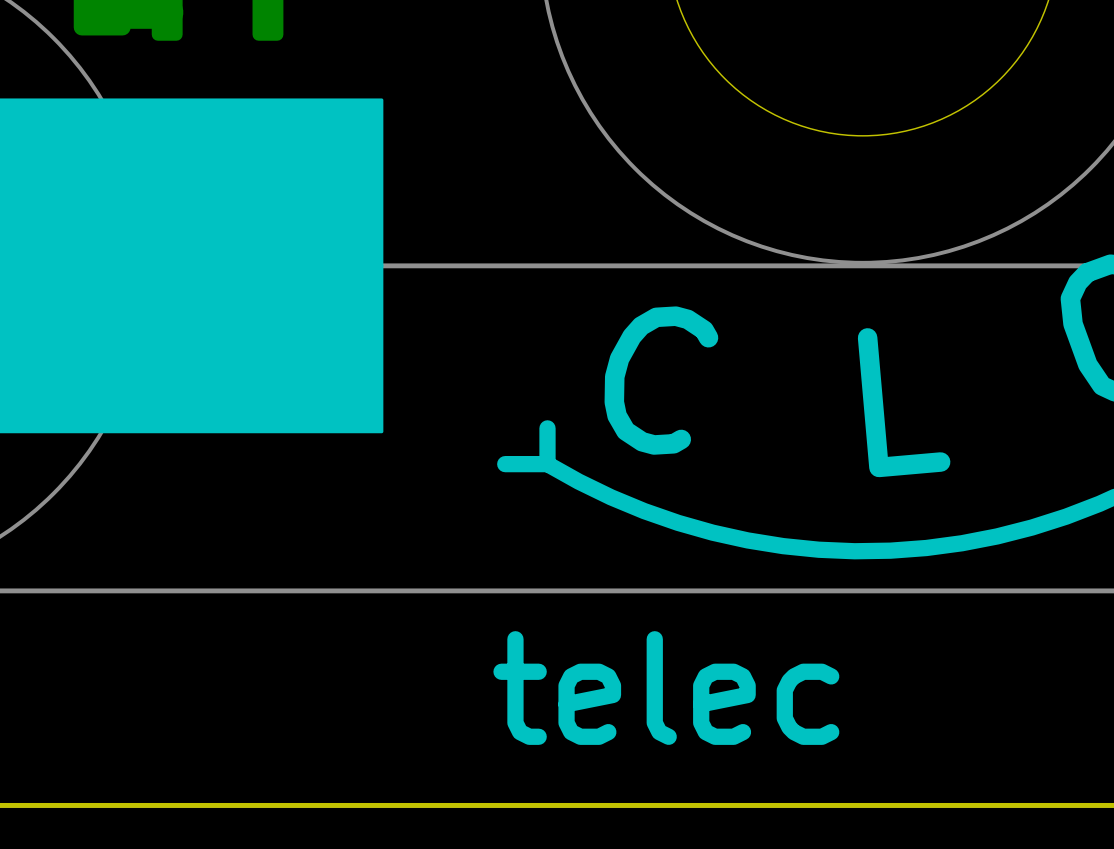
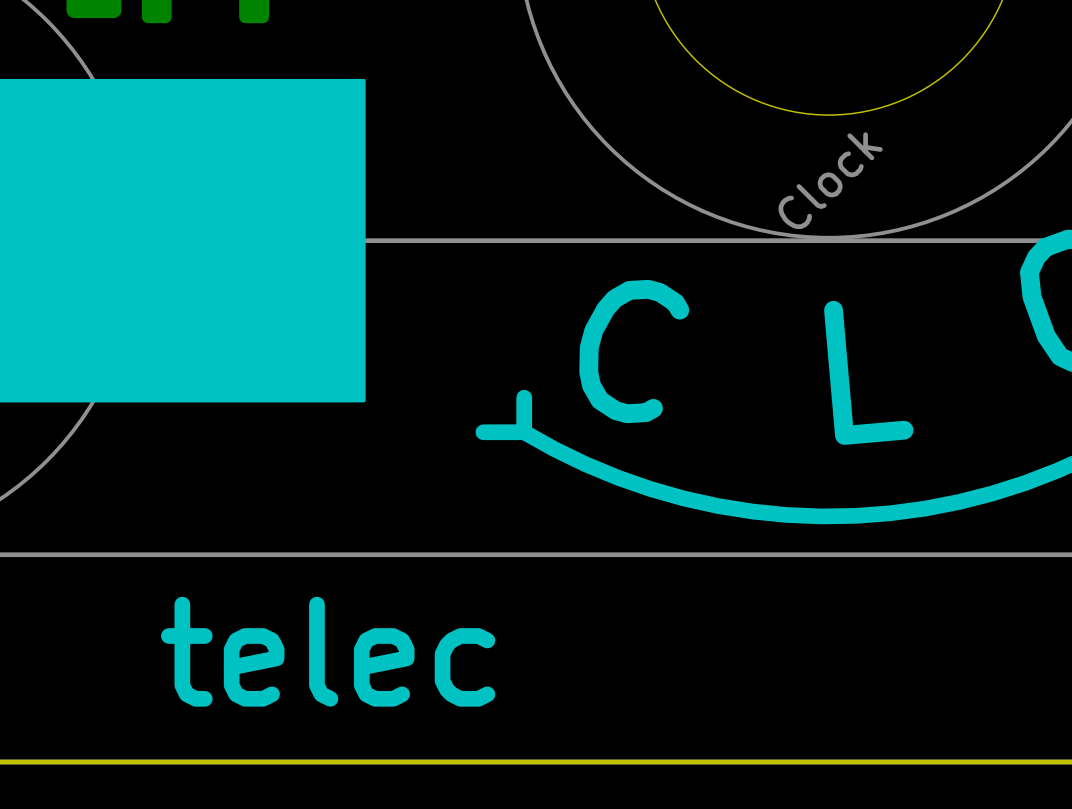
part value: none -> Clock (830, 180)
text position: telec (666, 688) -> telec (328, 651)

